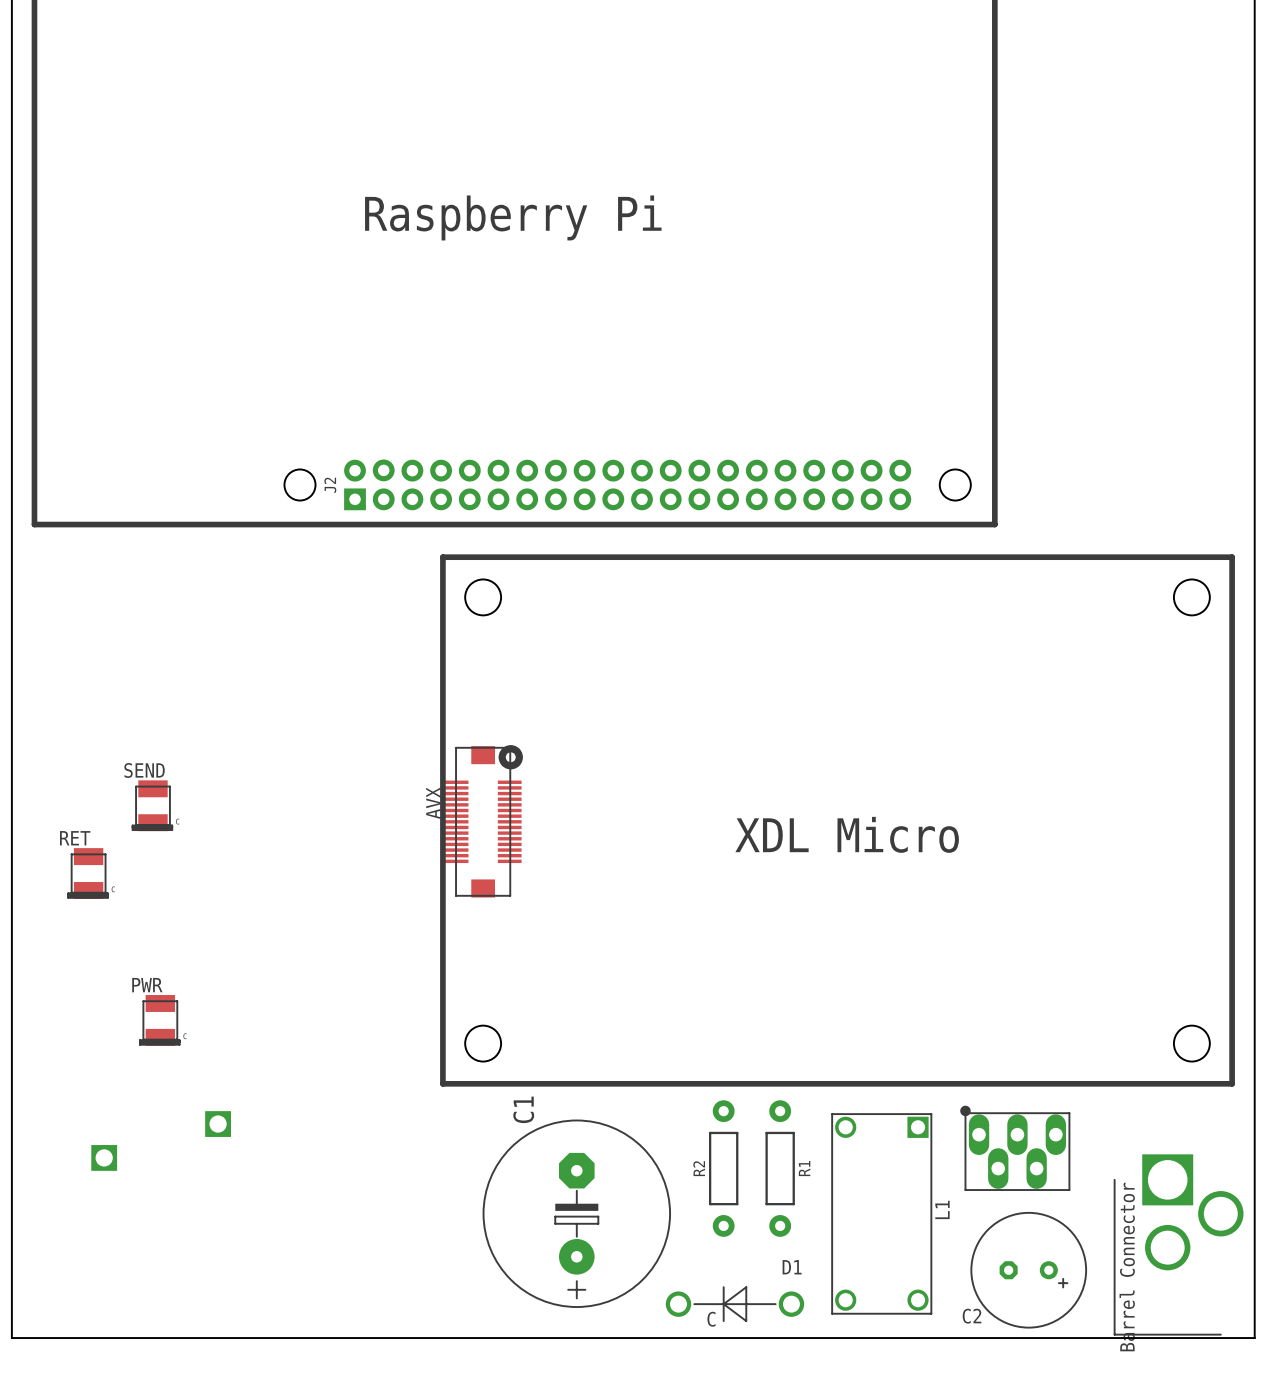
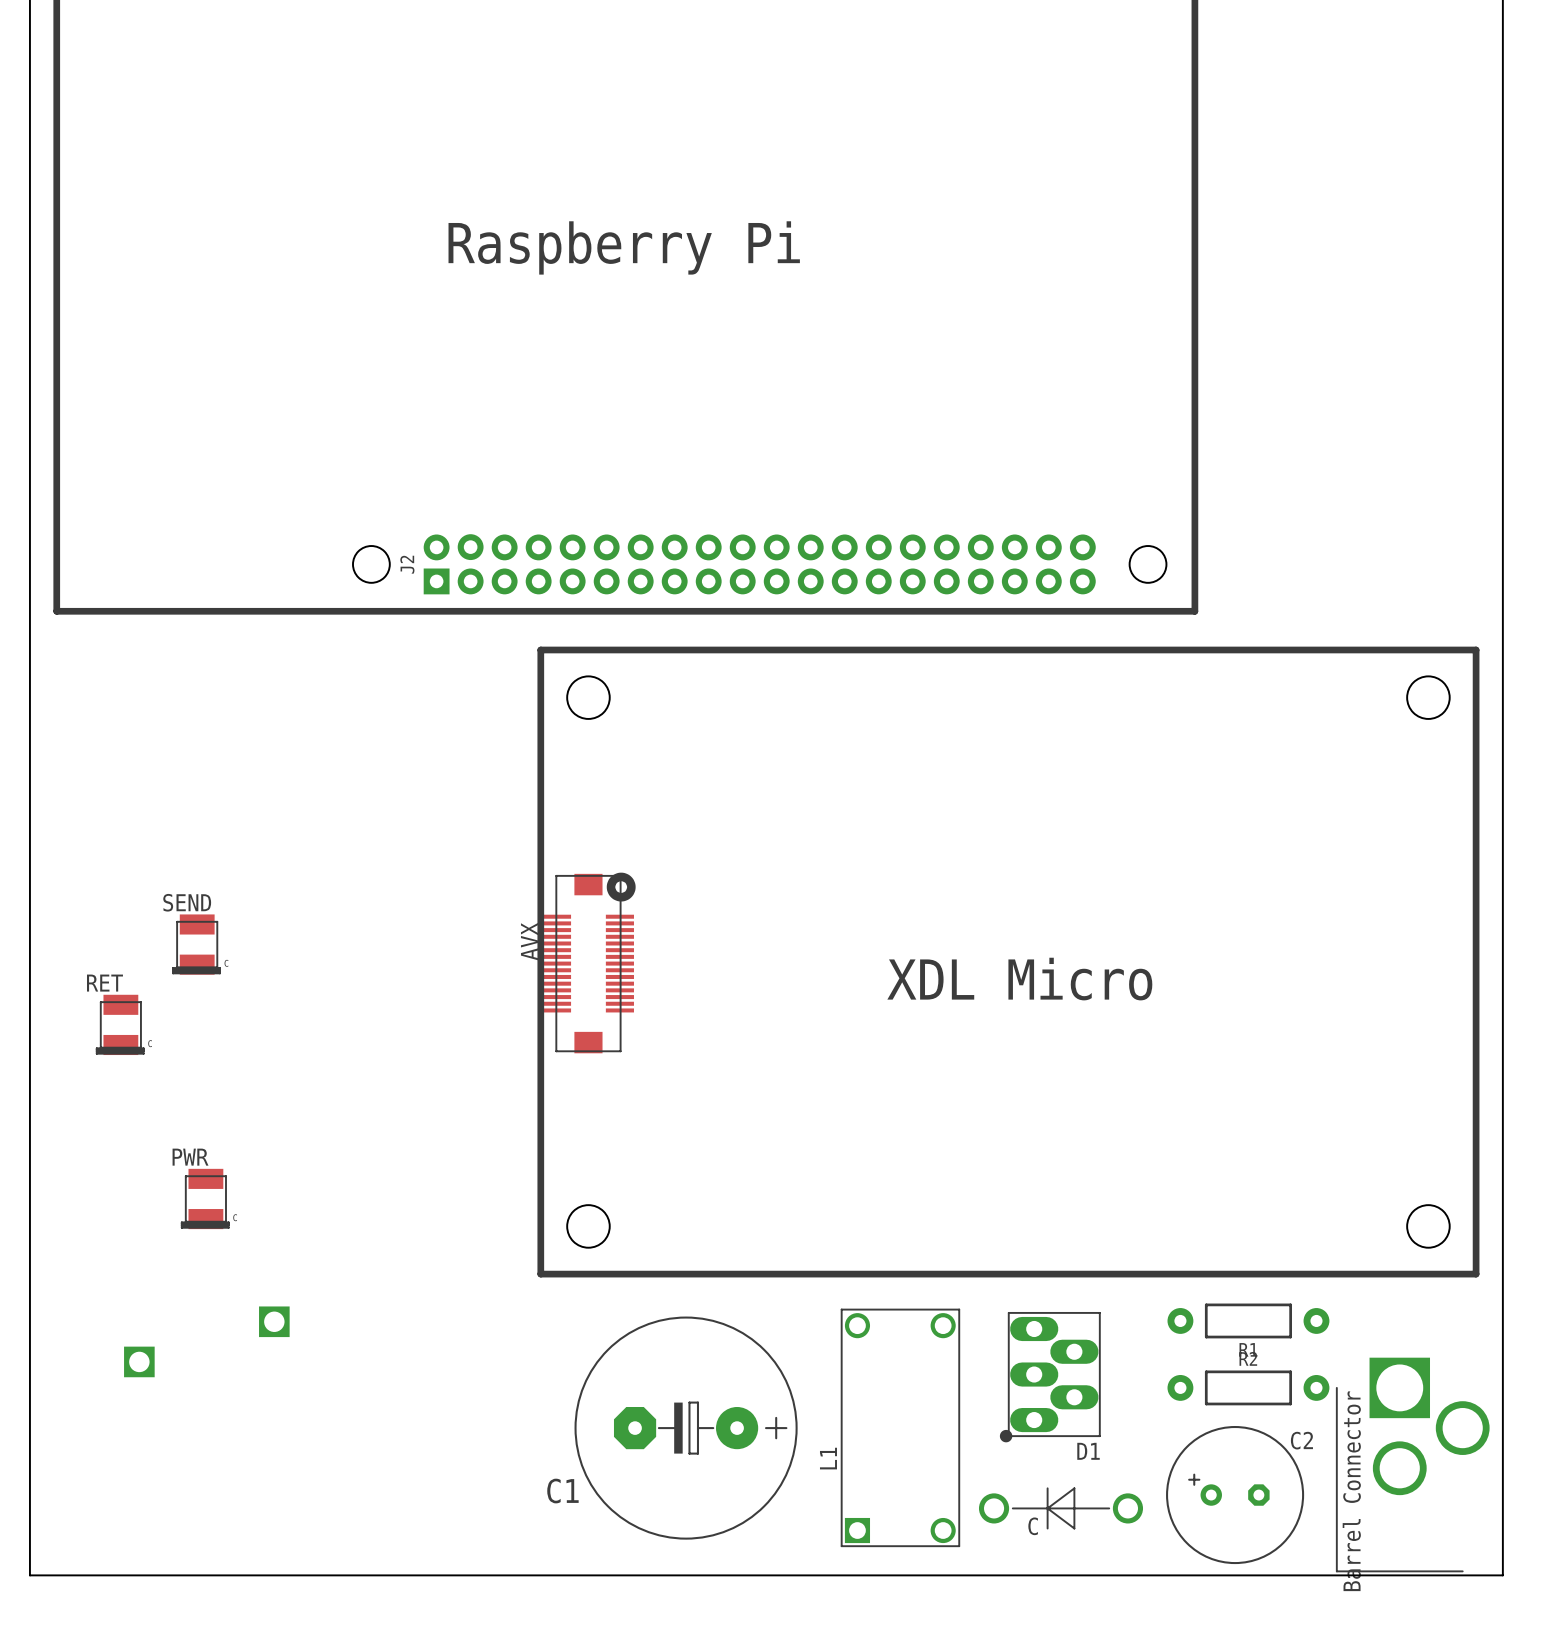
part rotation: 0° (1015, 1148) -> 90° counterclockwise (1050, 1377)
part position: (1015, 1148) -> (1050, 1377)
R2 rotation: 0° (723, 1168) -> 90° clockwise (1248, 1387)
R2 position: (723, 1168) -> (1248, 1387)
R1 rotation: 0° (780, 1168) -> 90° clockwise (1248, 1320)
R1 position: (780, 1168) -> (1248, 1320)
L1 name position: L1 (942, 1209) -> L1 (828, 1458)
C1 rotation: 0° (576, 1213) -> 90° counterclockwise (686, 1428)
L1 rotation: 0° (881, 1213) -> 180° (900, 1427)
L1 position: (881, 1213) -> (900, 1427)
D1 name position: D1 (792, 1267) -> D1 (1088, 1451)
C2 rotation: 0° (1028, 1270) -> 180° (1235, 1495)
D1 position: (734, 1304) -> (1061, 1508)

